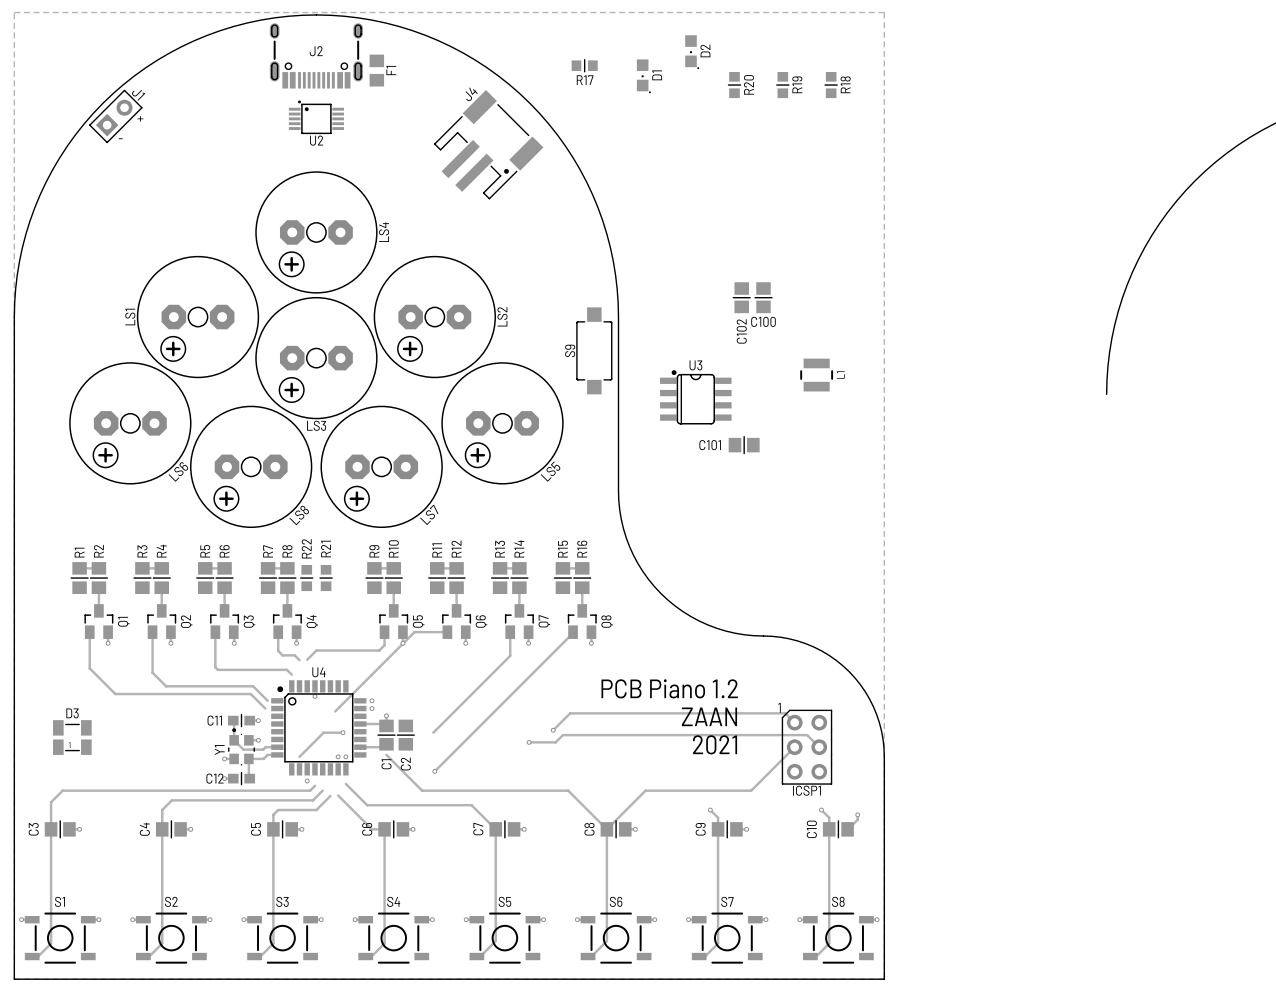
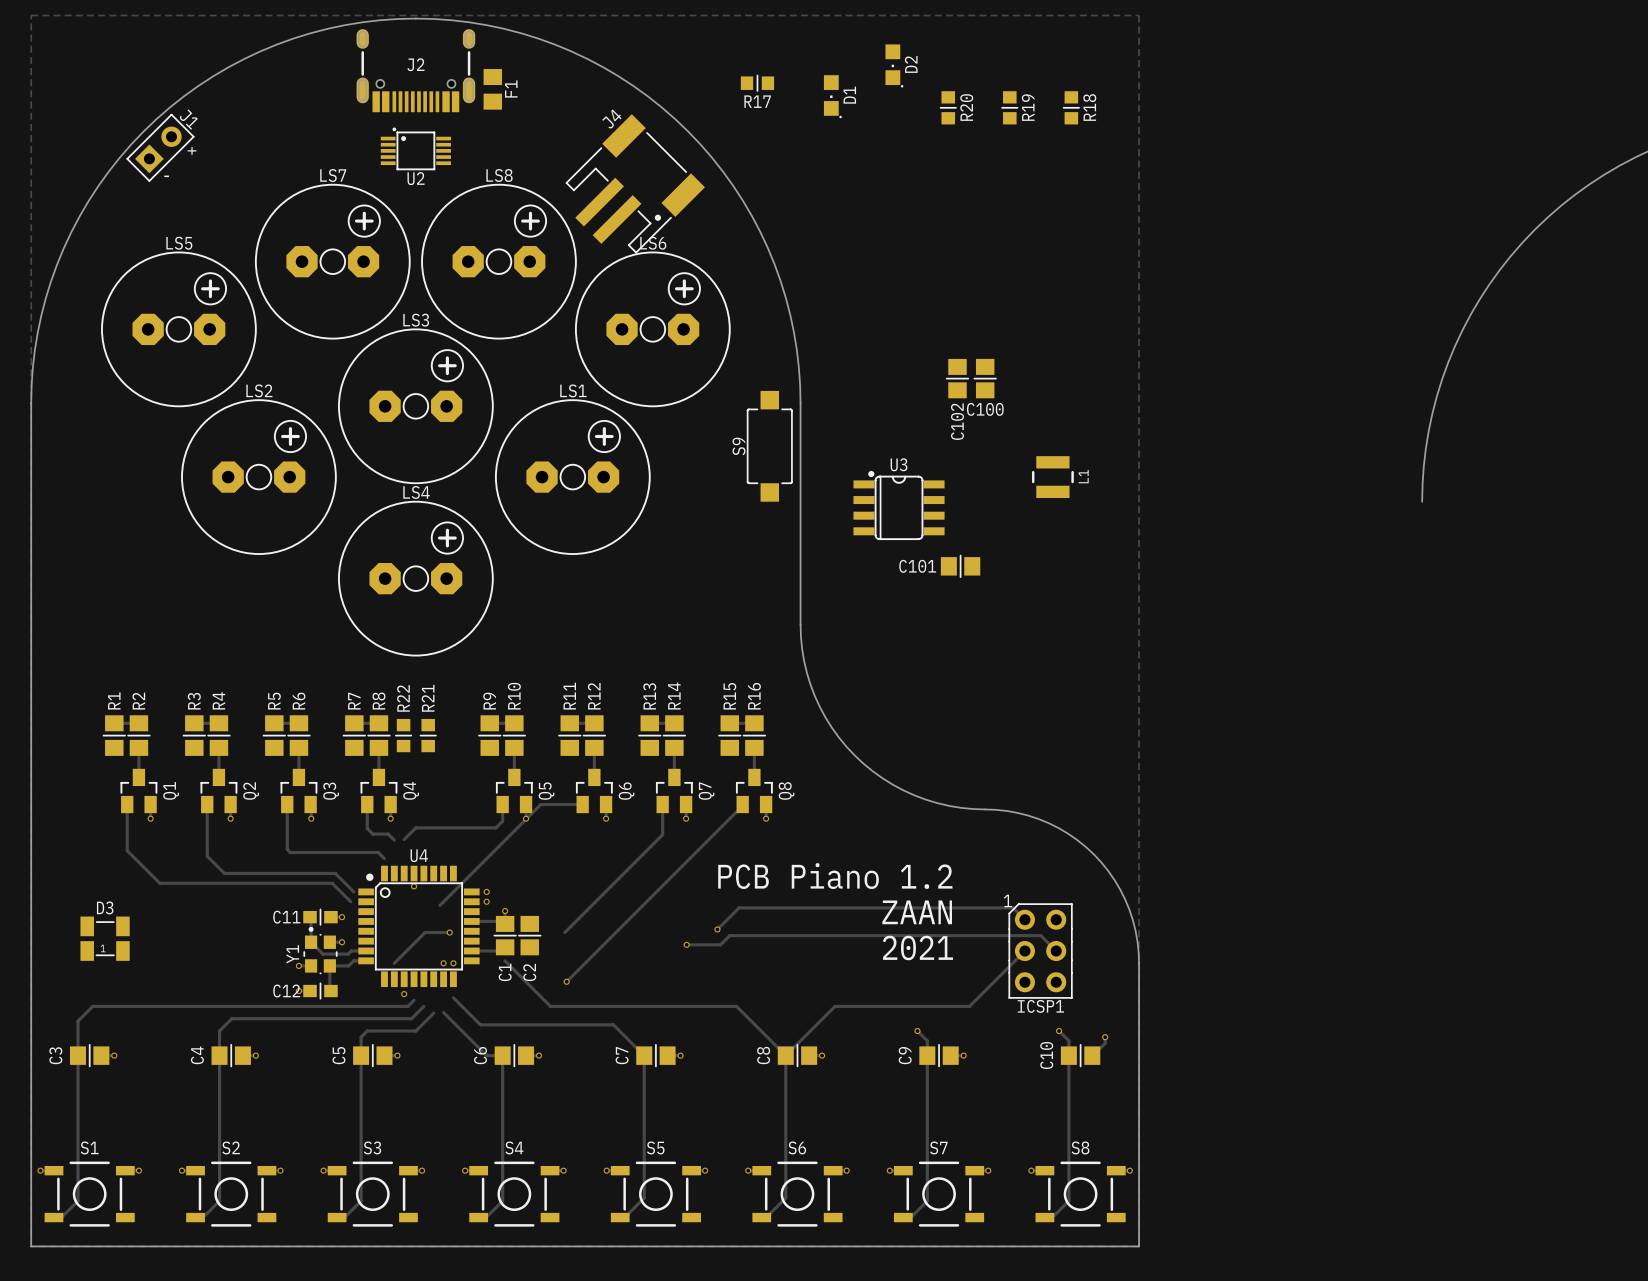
LS4 rotation: 0° (316, 232) -> 180° (415, 578)
LS4 position: (316, 232) -> (415, 578)
LS4 name position: LS4 (384, 232) -> LS4 (416, 492)
LS2 name position: LS2 (502, 316) -> LS2 (259, 390)
LS1 name position: LS1 (130, 317) -> LS1 (573, 390)
LS1 rotation: 0° (198, 317) -> 180° (572, 477)
LS1 position: (198, 317) -> (572, 477)
LS2 rotation: 0° (434, 317) -> 180° (258, 477)
LS2 position: (434, 317) -> (258, 477)
LS3 rotation: 0° (316, 358) -> 180° (415, 406)
LS6 rotation: 0° (130, 423) -> 180° (652, 329)
LS6 position: (130, 423) -> (652, 329)
LS5 rotation: 0° (502, 423) -> 180° (178, 329)
LS5 position: (502, 423) -> (178, 329)
LS8 rotation: 0° (251, 466) -> 180° (498, 261)
LS8 position: (251, 466) -> (498, 261)
LS7 rotation: 0° (381, 466) -> 180° (332, 261)
LS7 position: (381, 466) -> (332, 261)
LS5 name position: LS5 (550, 471) -> LS5 (179, 243)
LS6 name position: LS6 (178, 472) -> LS6 (653, 243)
LS7 name position: LS7 (429, 514) -> LS7 (333, 175)
LS8 name position: LS8 (299, 515) -> LS8 (499, 175)

